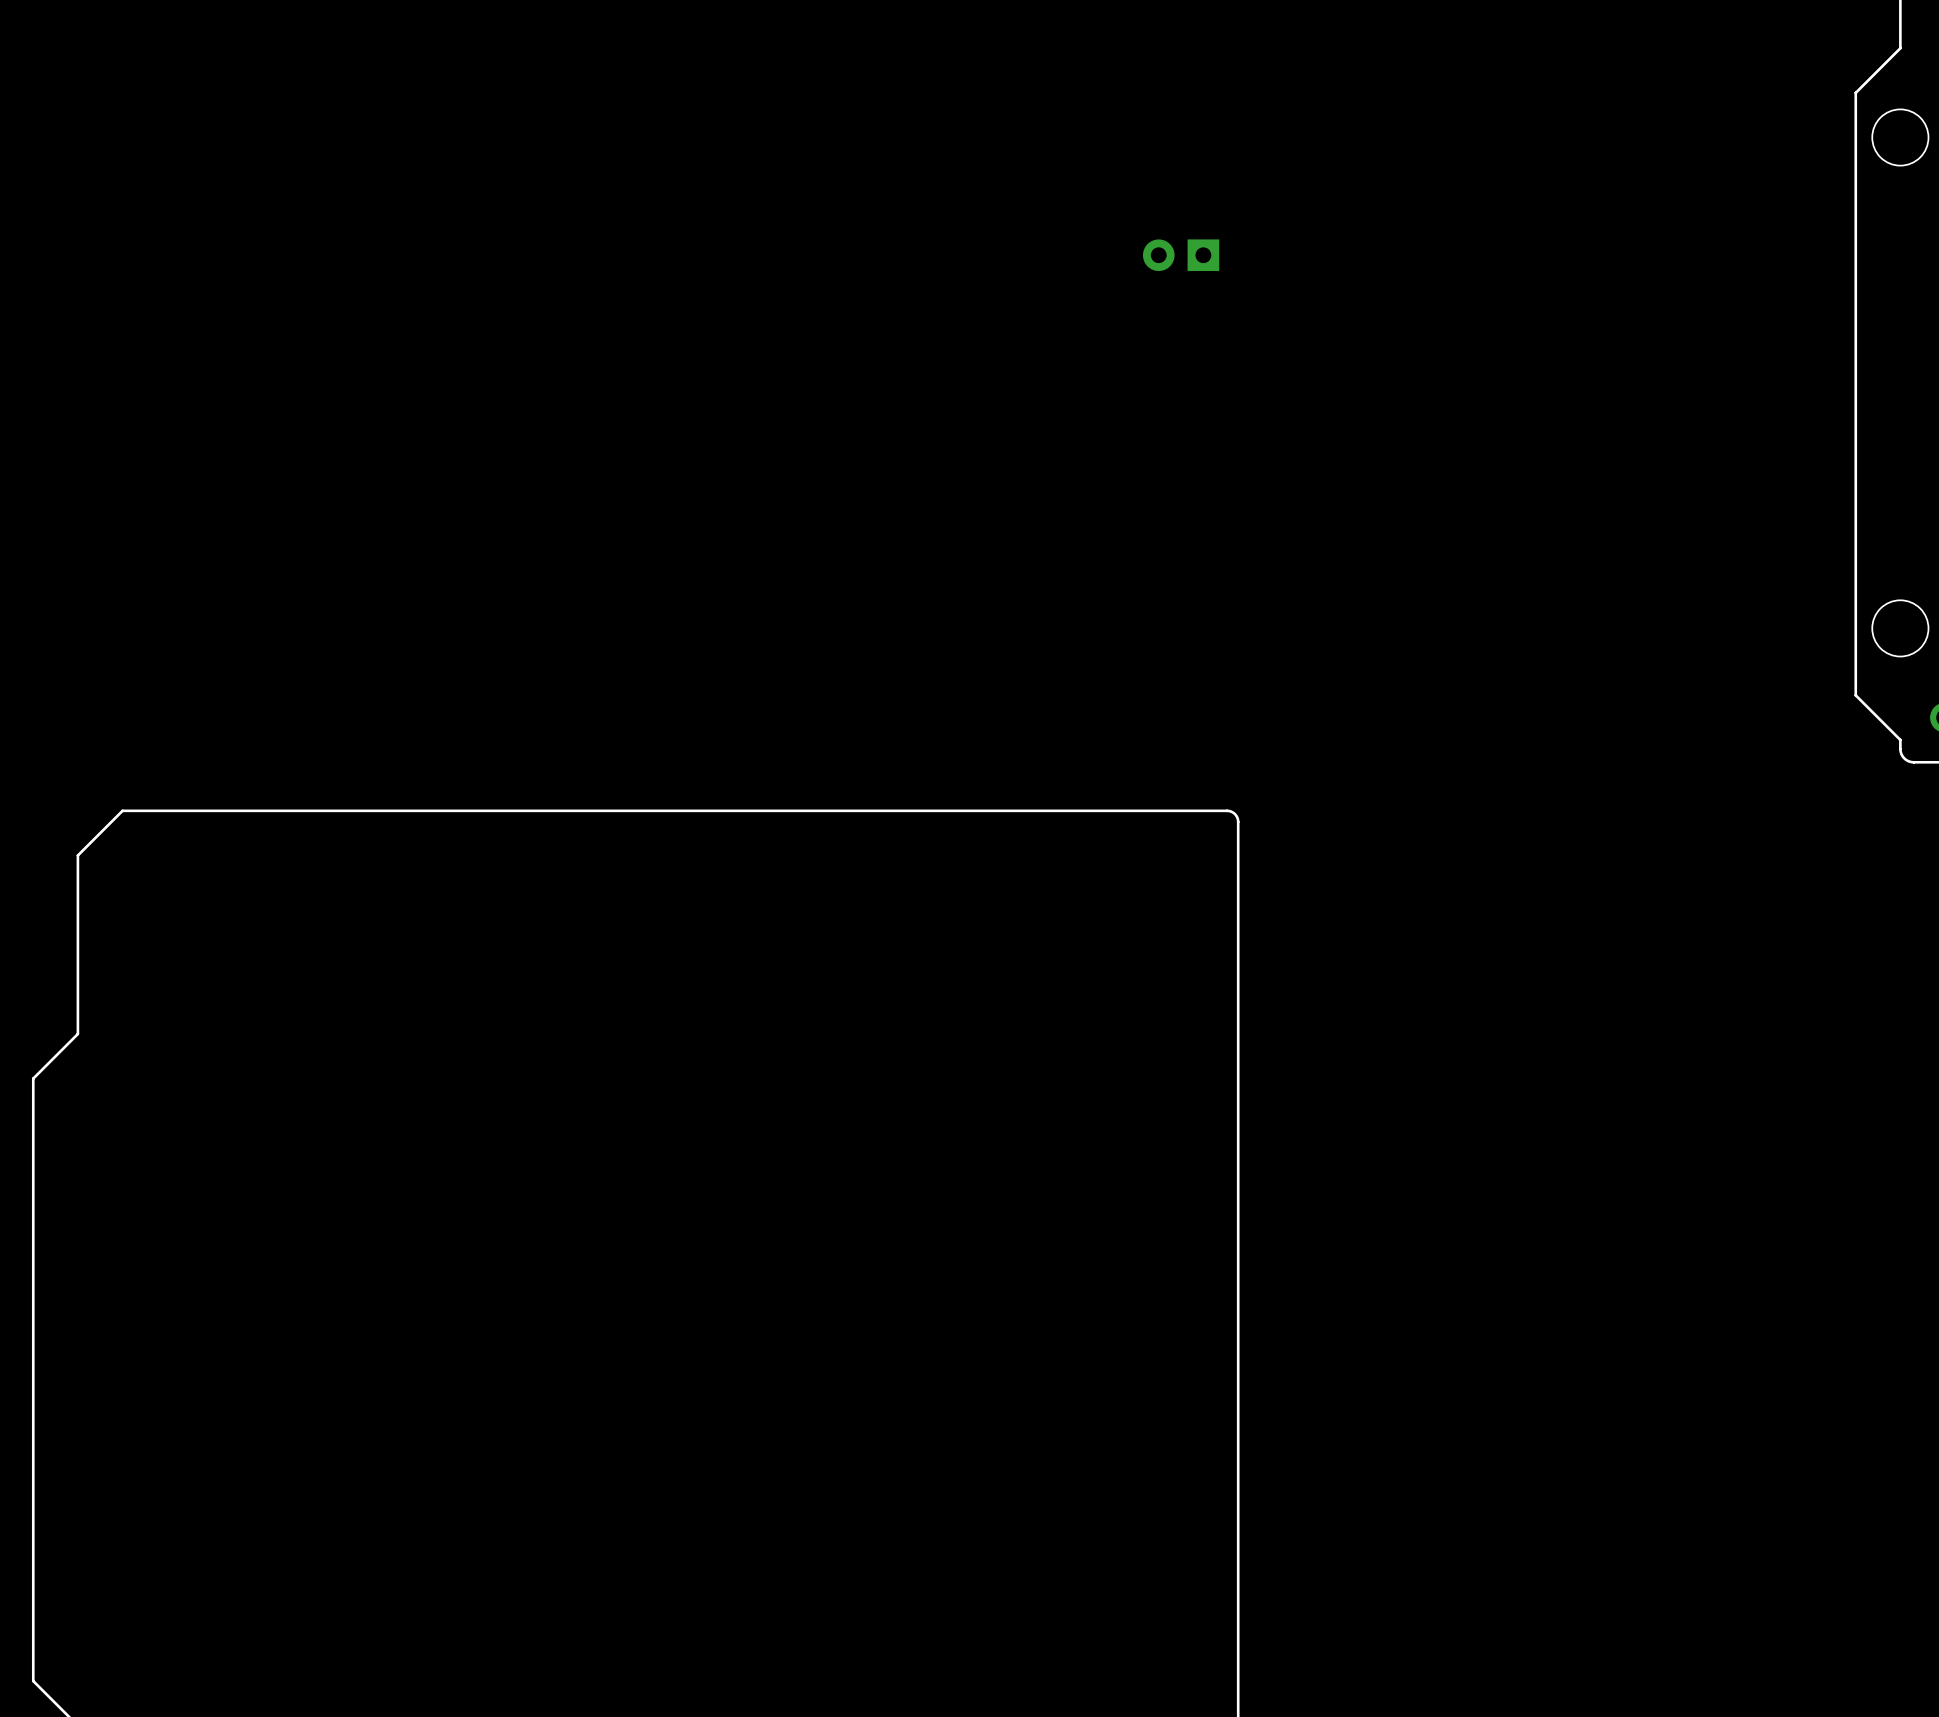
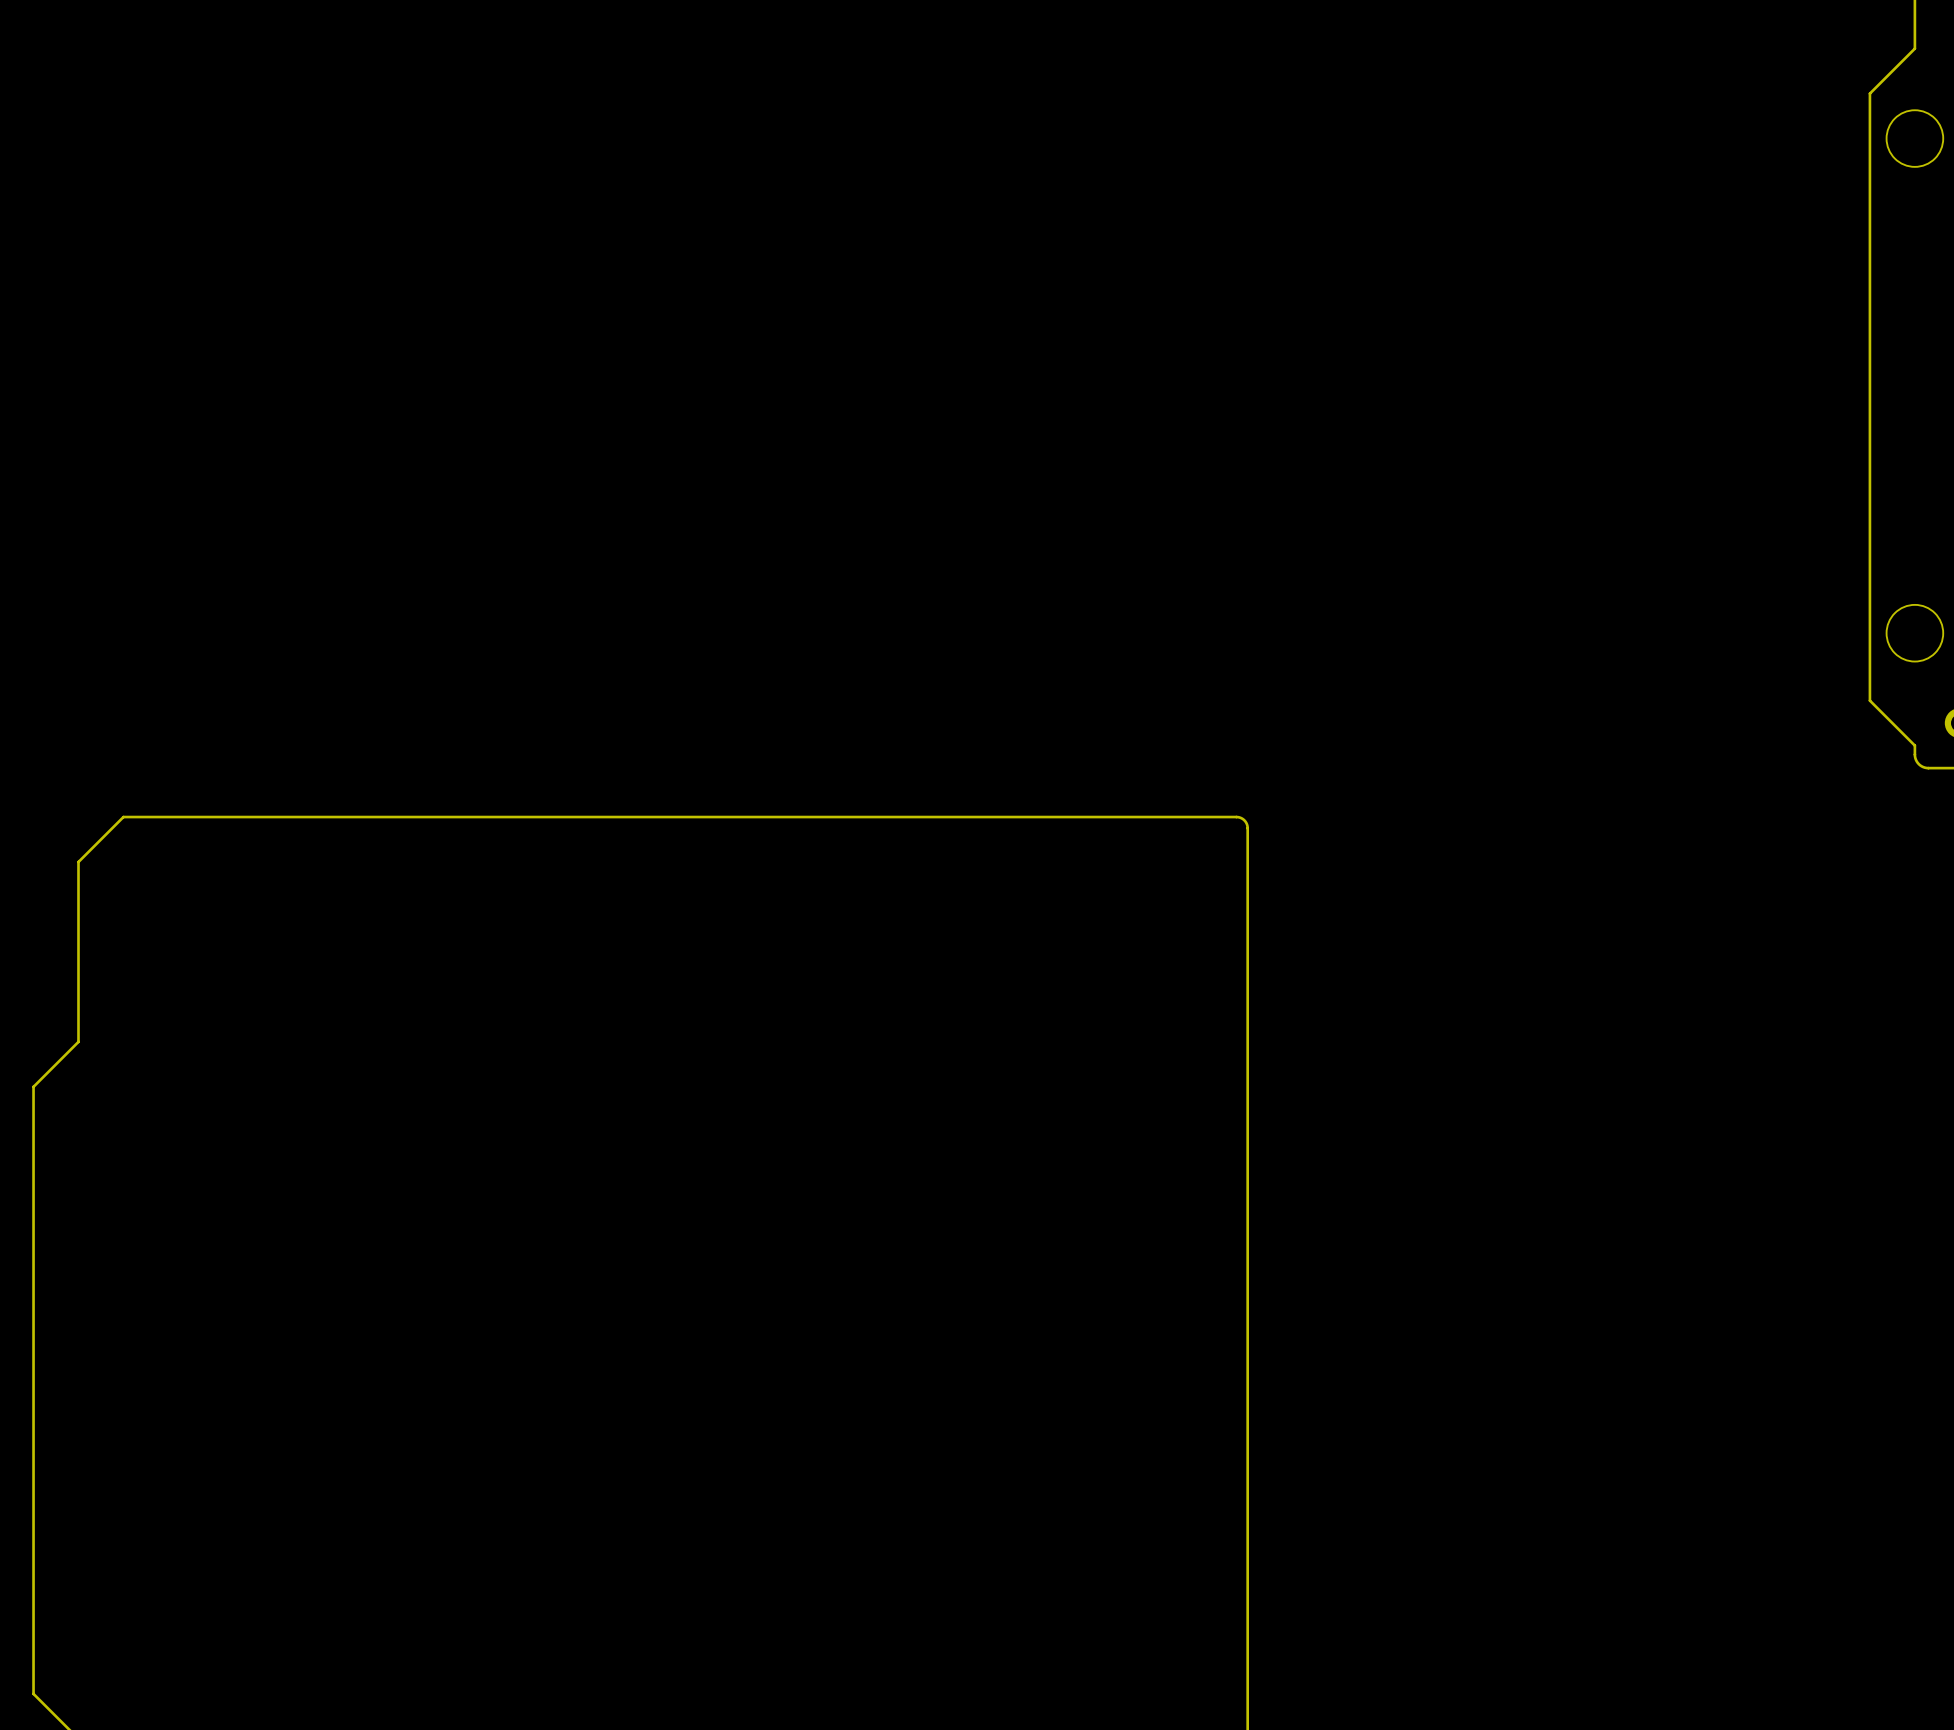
part: (1181, 255) -> none

